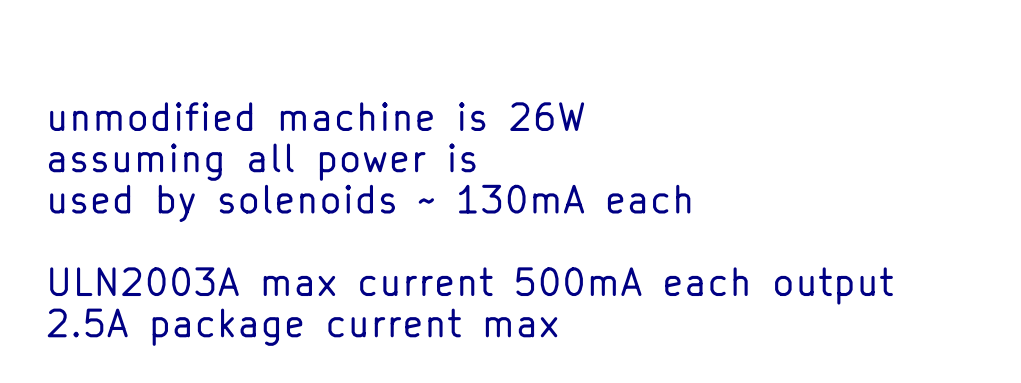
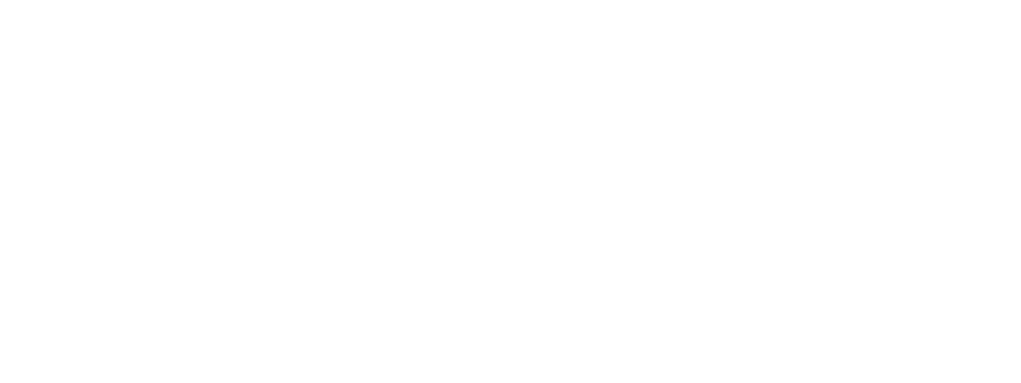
text: unmodified machine is 26W (317, 116) -> none
text: assuming all power is (262, 162) -> none
text: used by solenoids ~ 130mA each (370, 203) -> none
text: ULN2003A max current 500mA each output (471, 285) -> none
text: 2.5A package current max (302, 327) -> none

